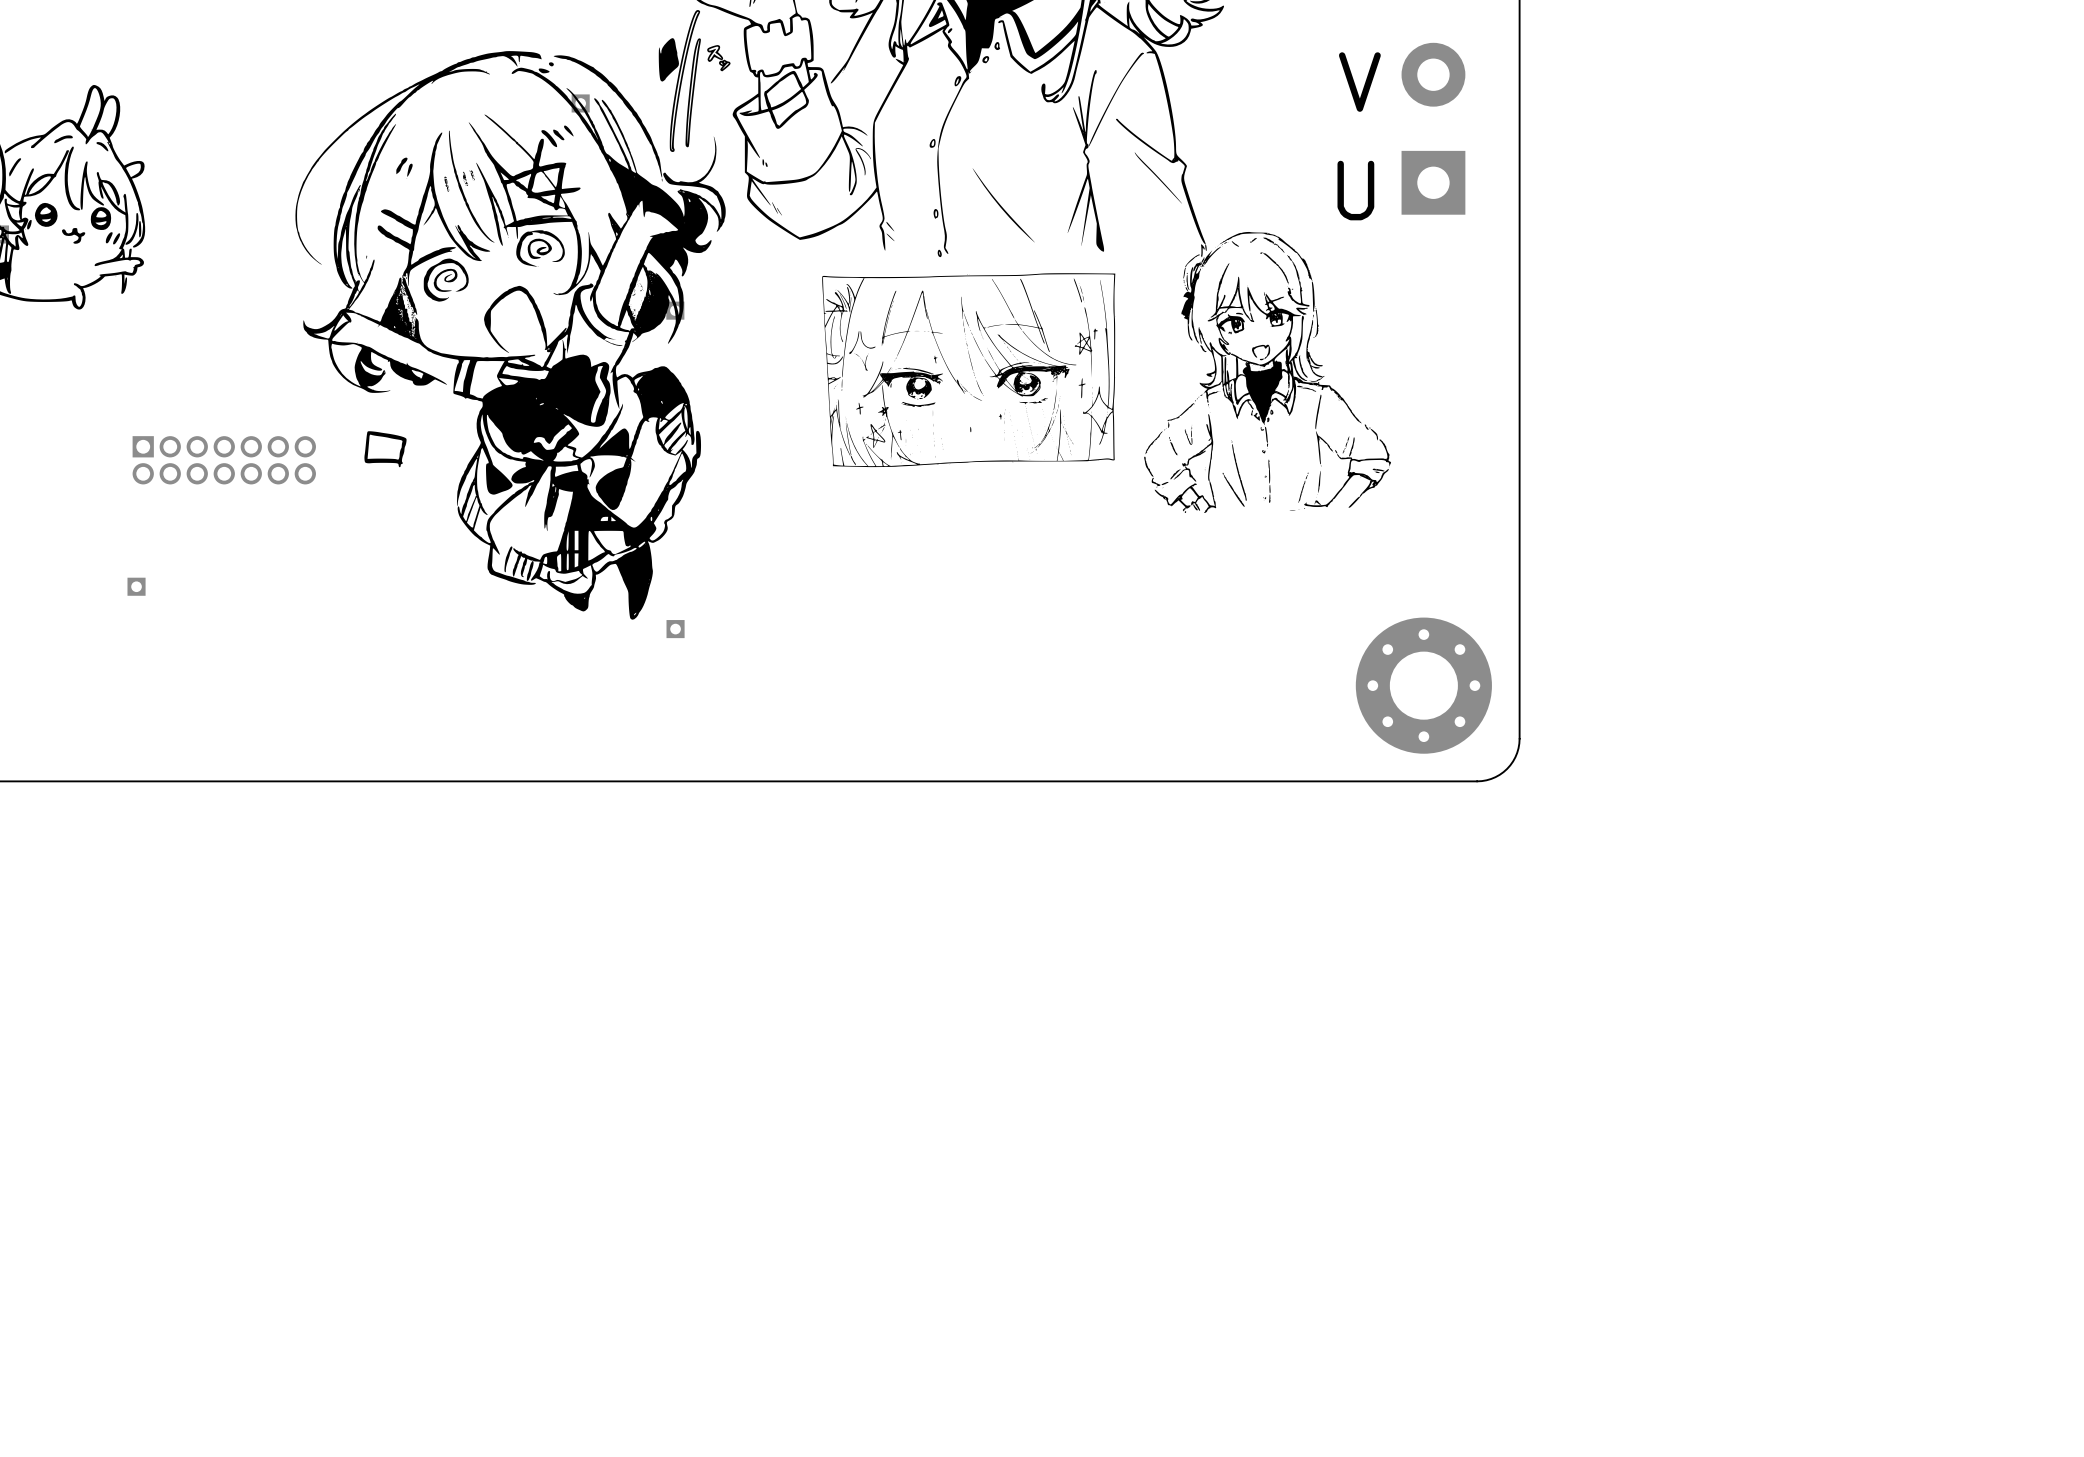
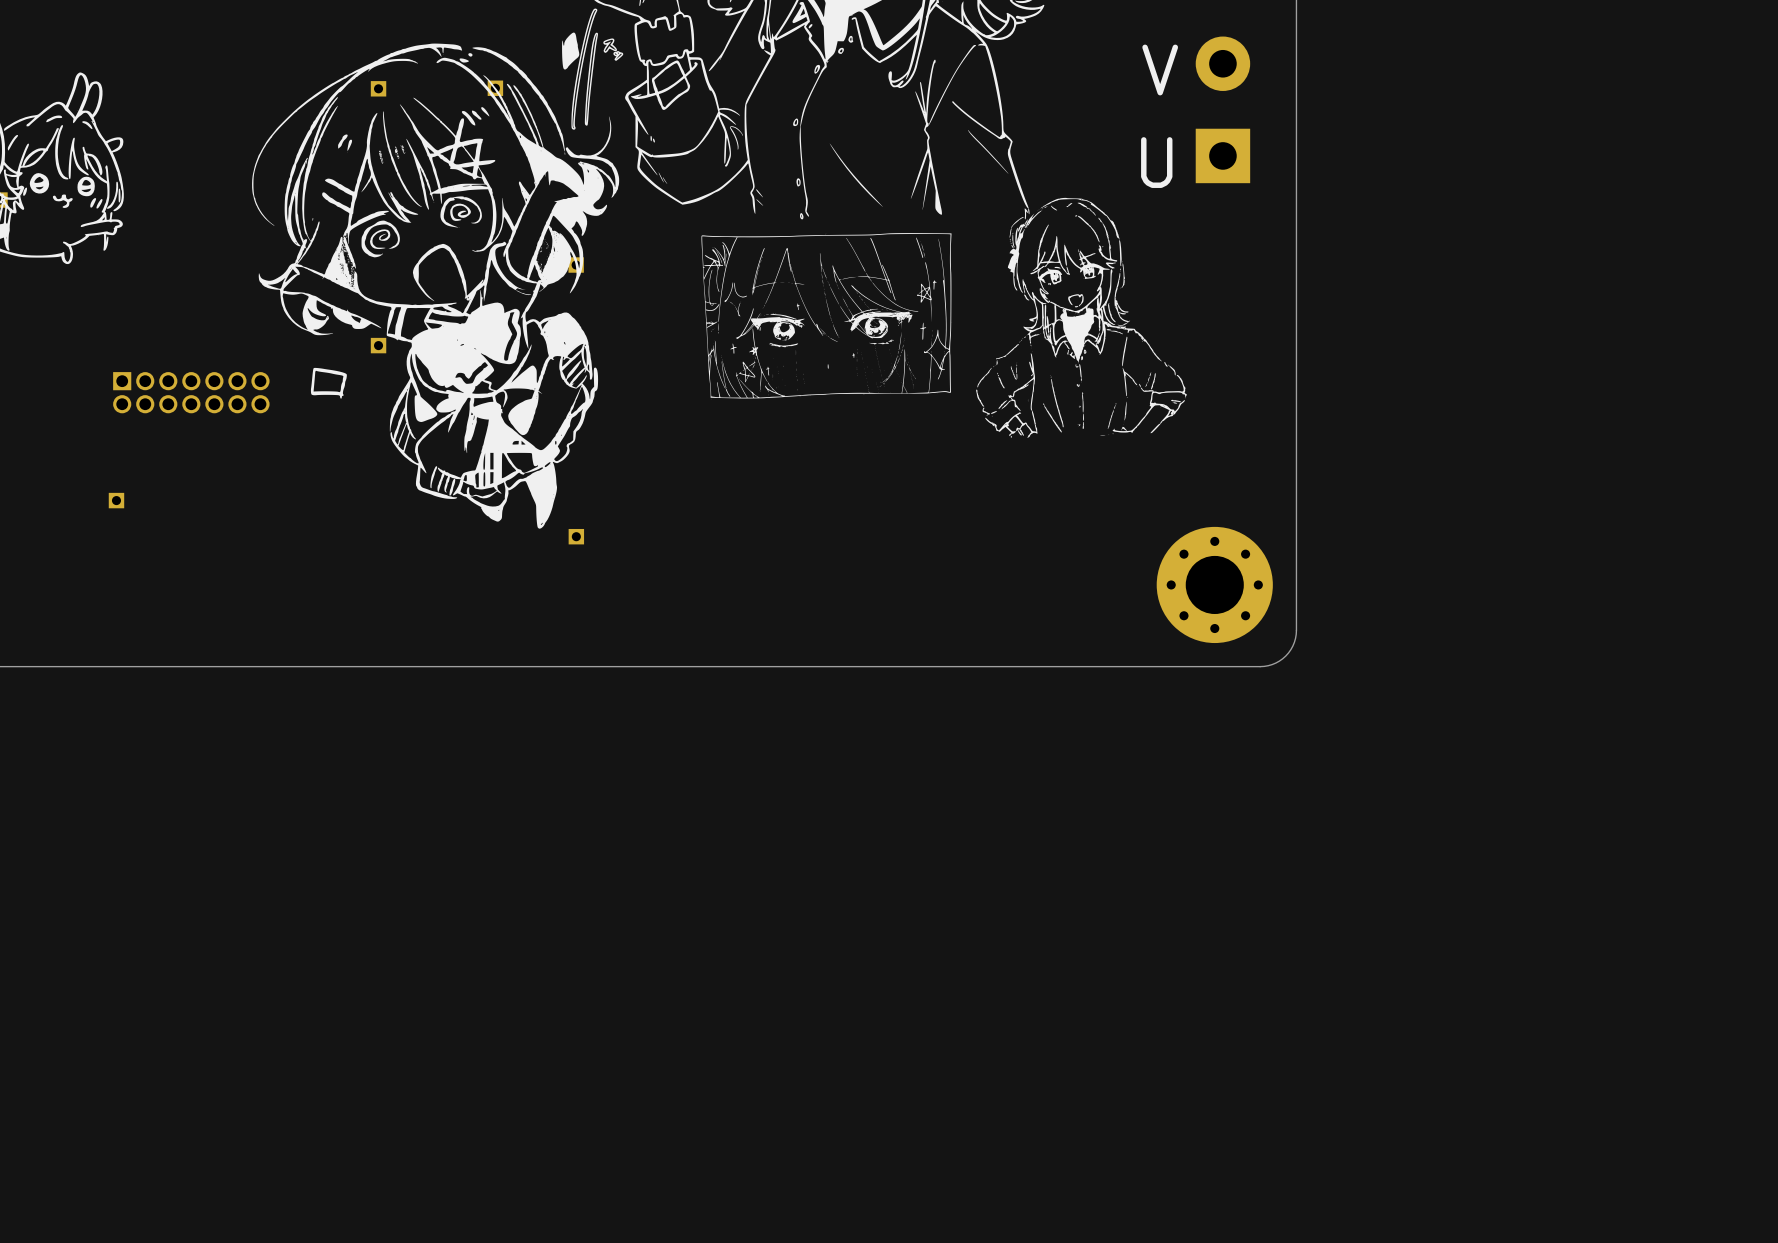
part: none -> (378, 88)
part: none -> (378, 345)

